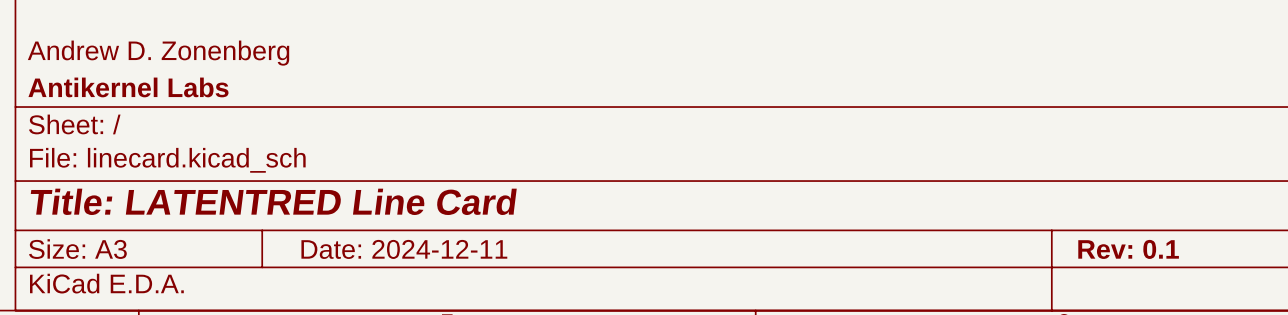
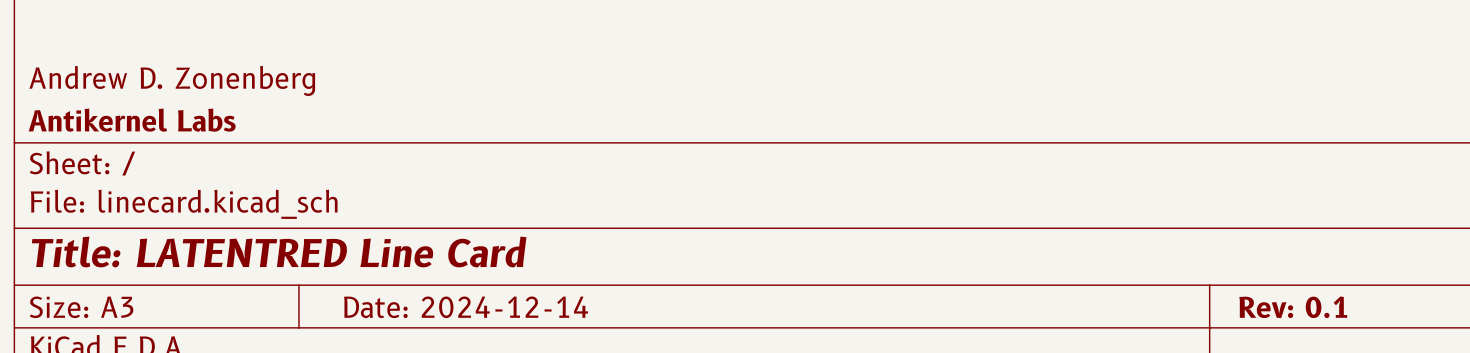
title block: Date: 2024-12-11 (404, 249) -> Date: 2024-12-14 (466, 307)

